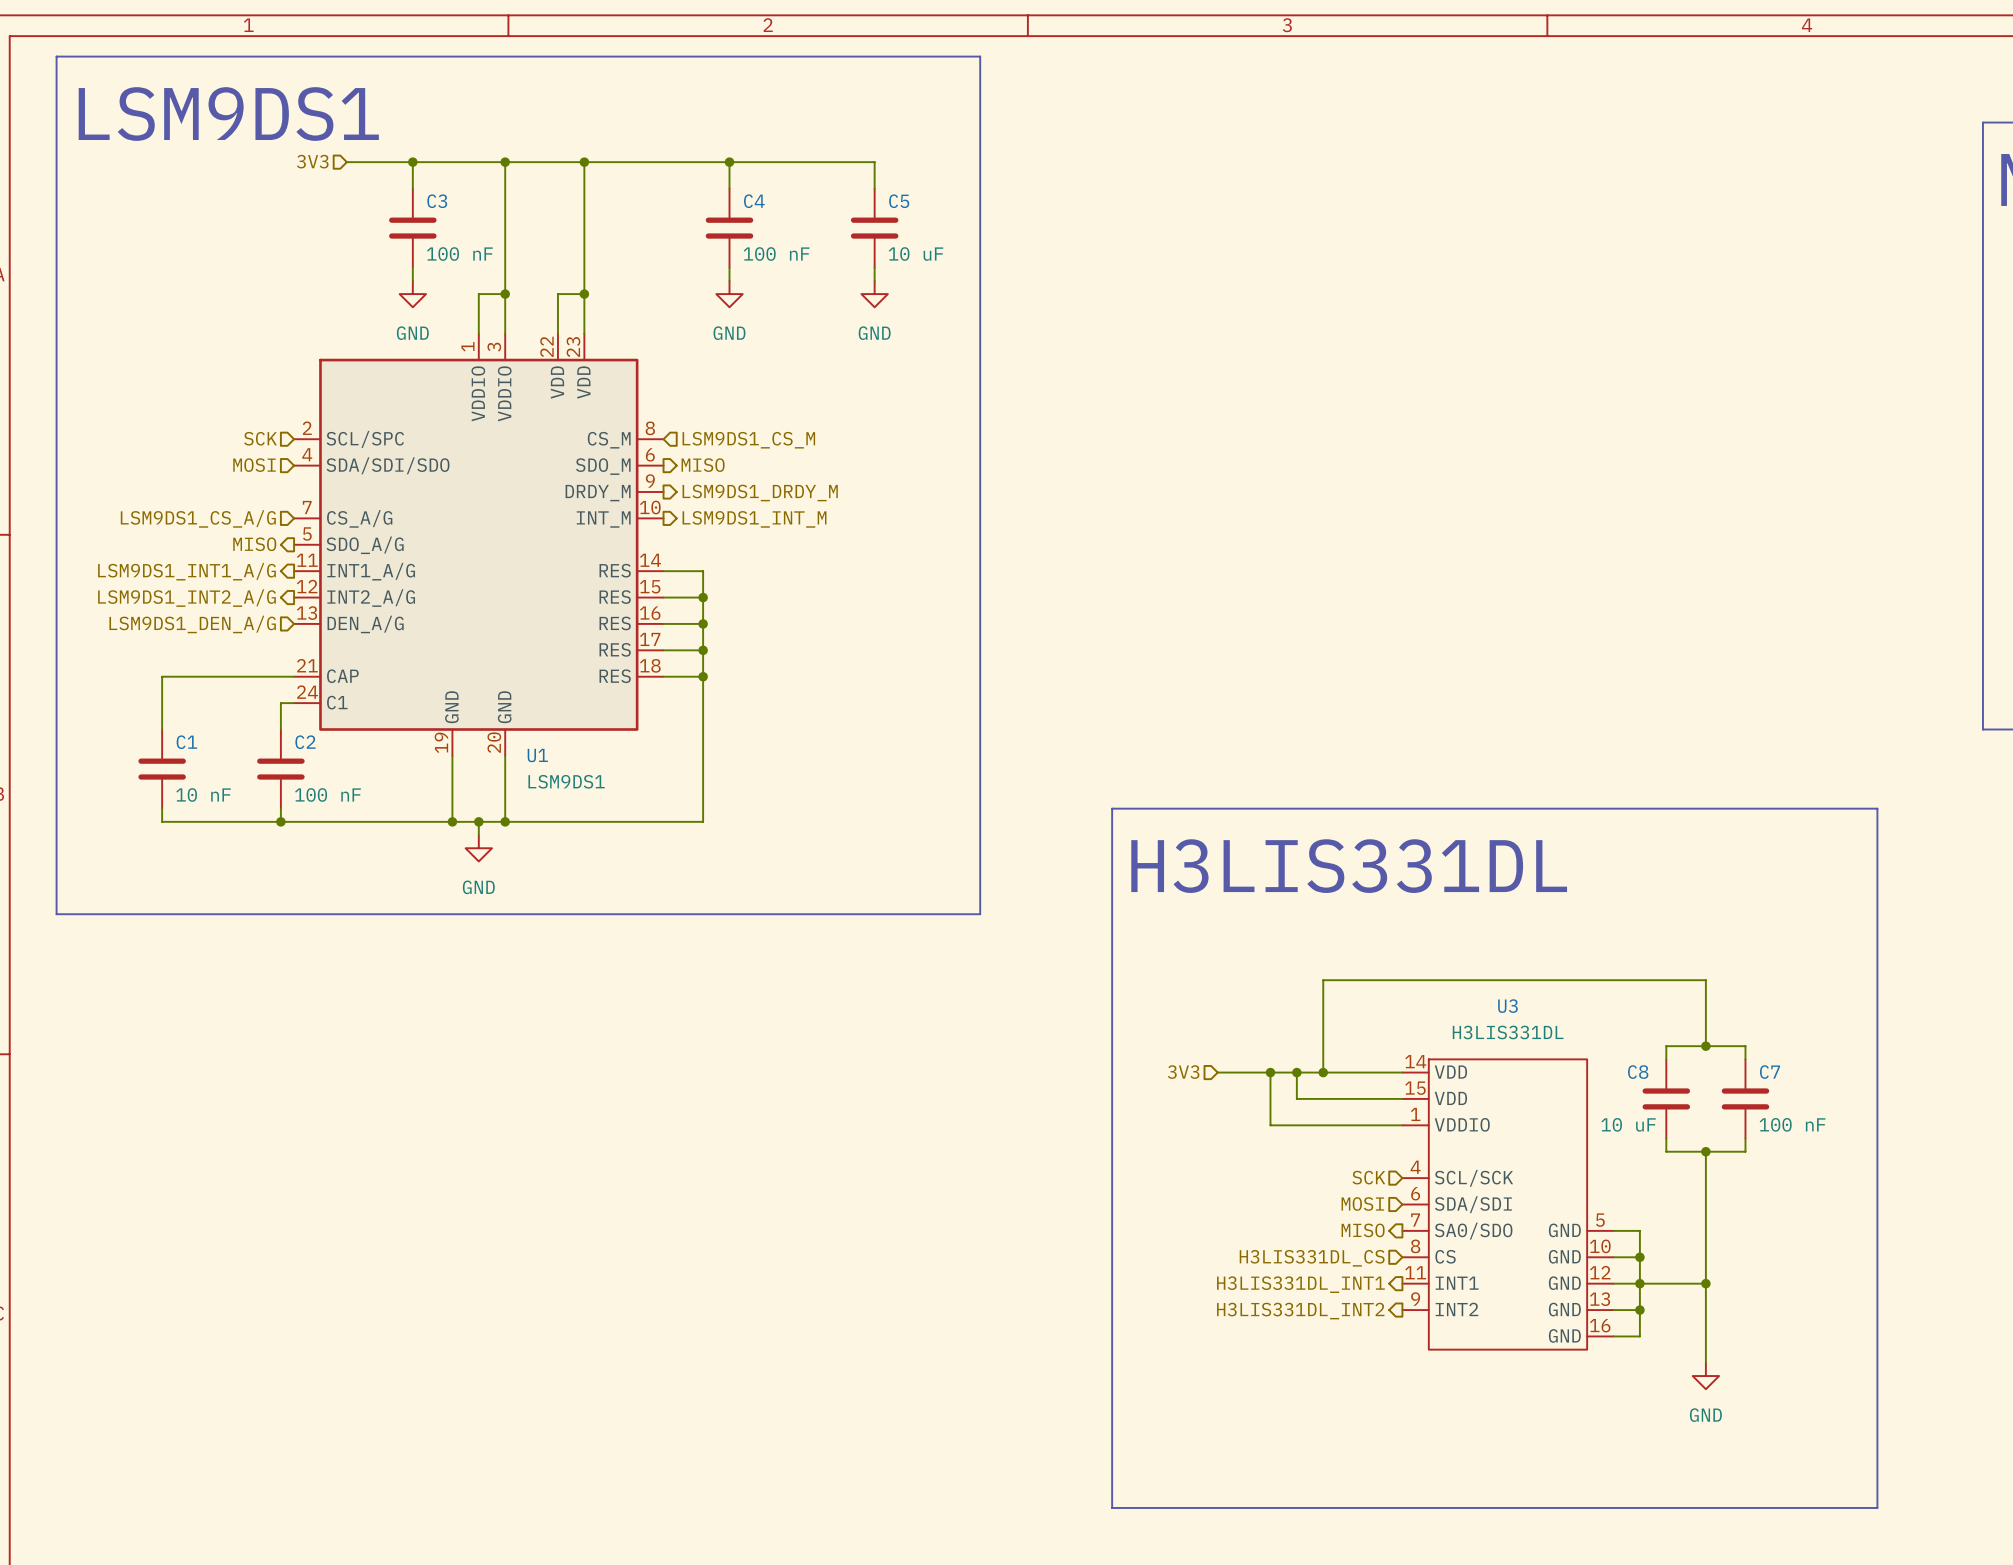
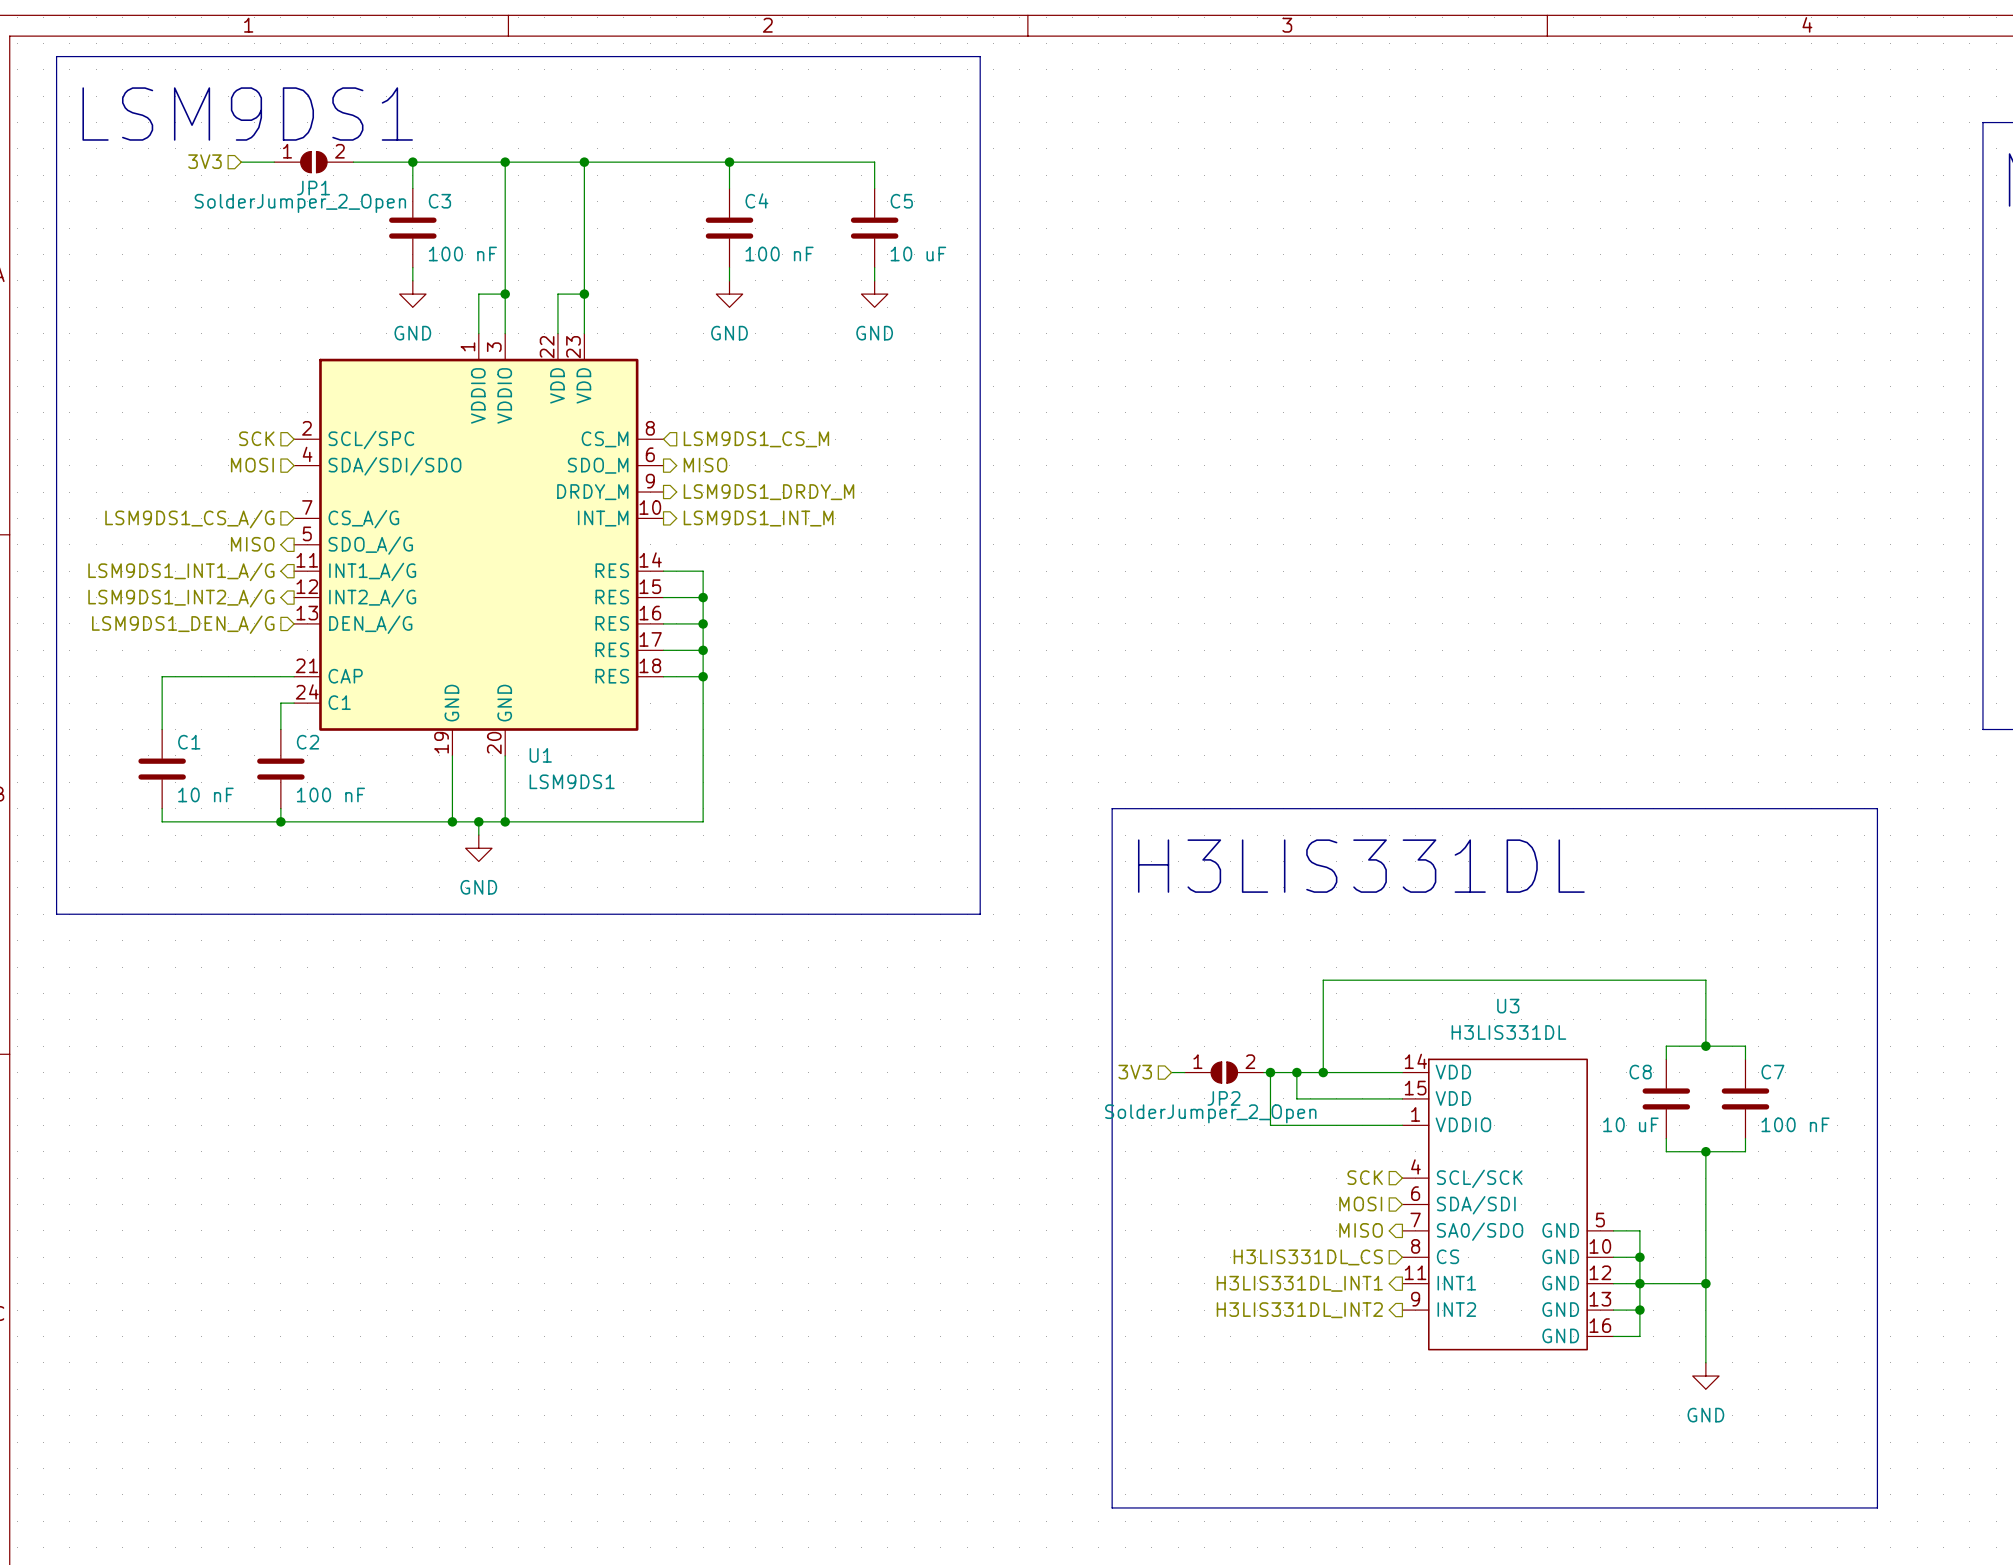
hierarchical label position: 3V3 (312, 161) -> 3V3 (204, 161)
wire: none -> (241, 162) (274, 162)
JP1: none -> SolderJumper_2_Open (313, 162)
wire: none -> (1171, 1072) (1184, 1072)
hierarchical label position: 3V3 (1183, 1072) -> 3V3 (1135, 1072)
JP2: none -> SolderJumper_2_Open (1224, 1072)

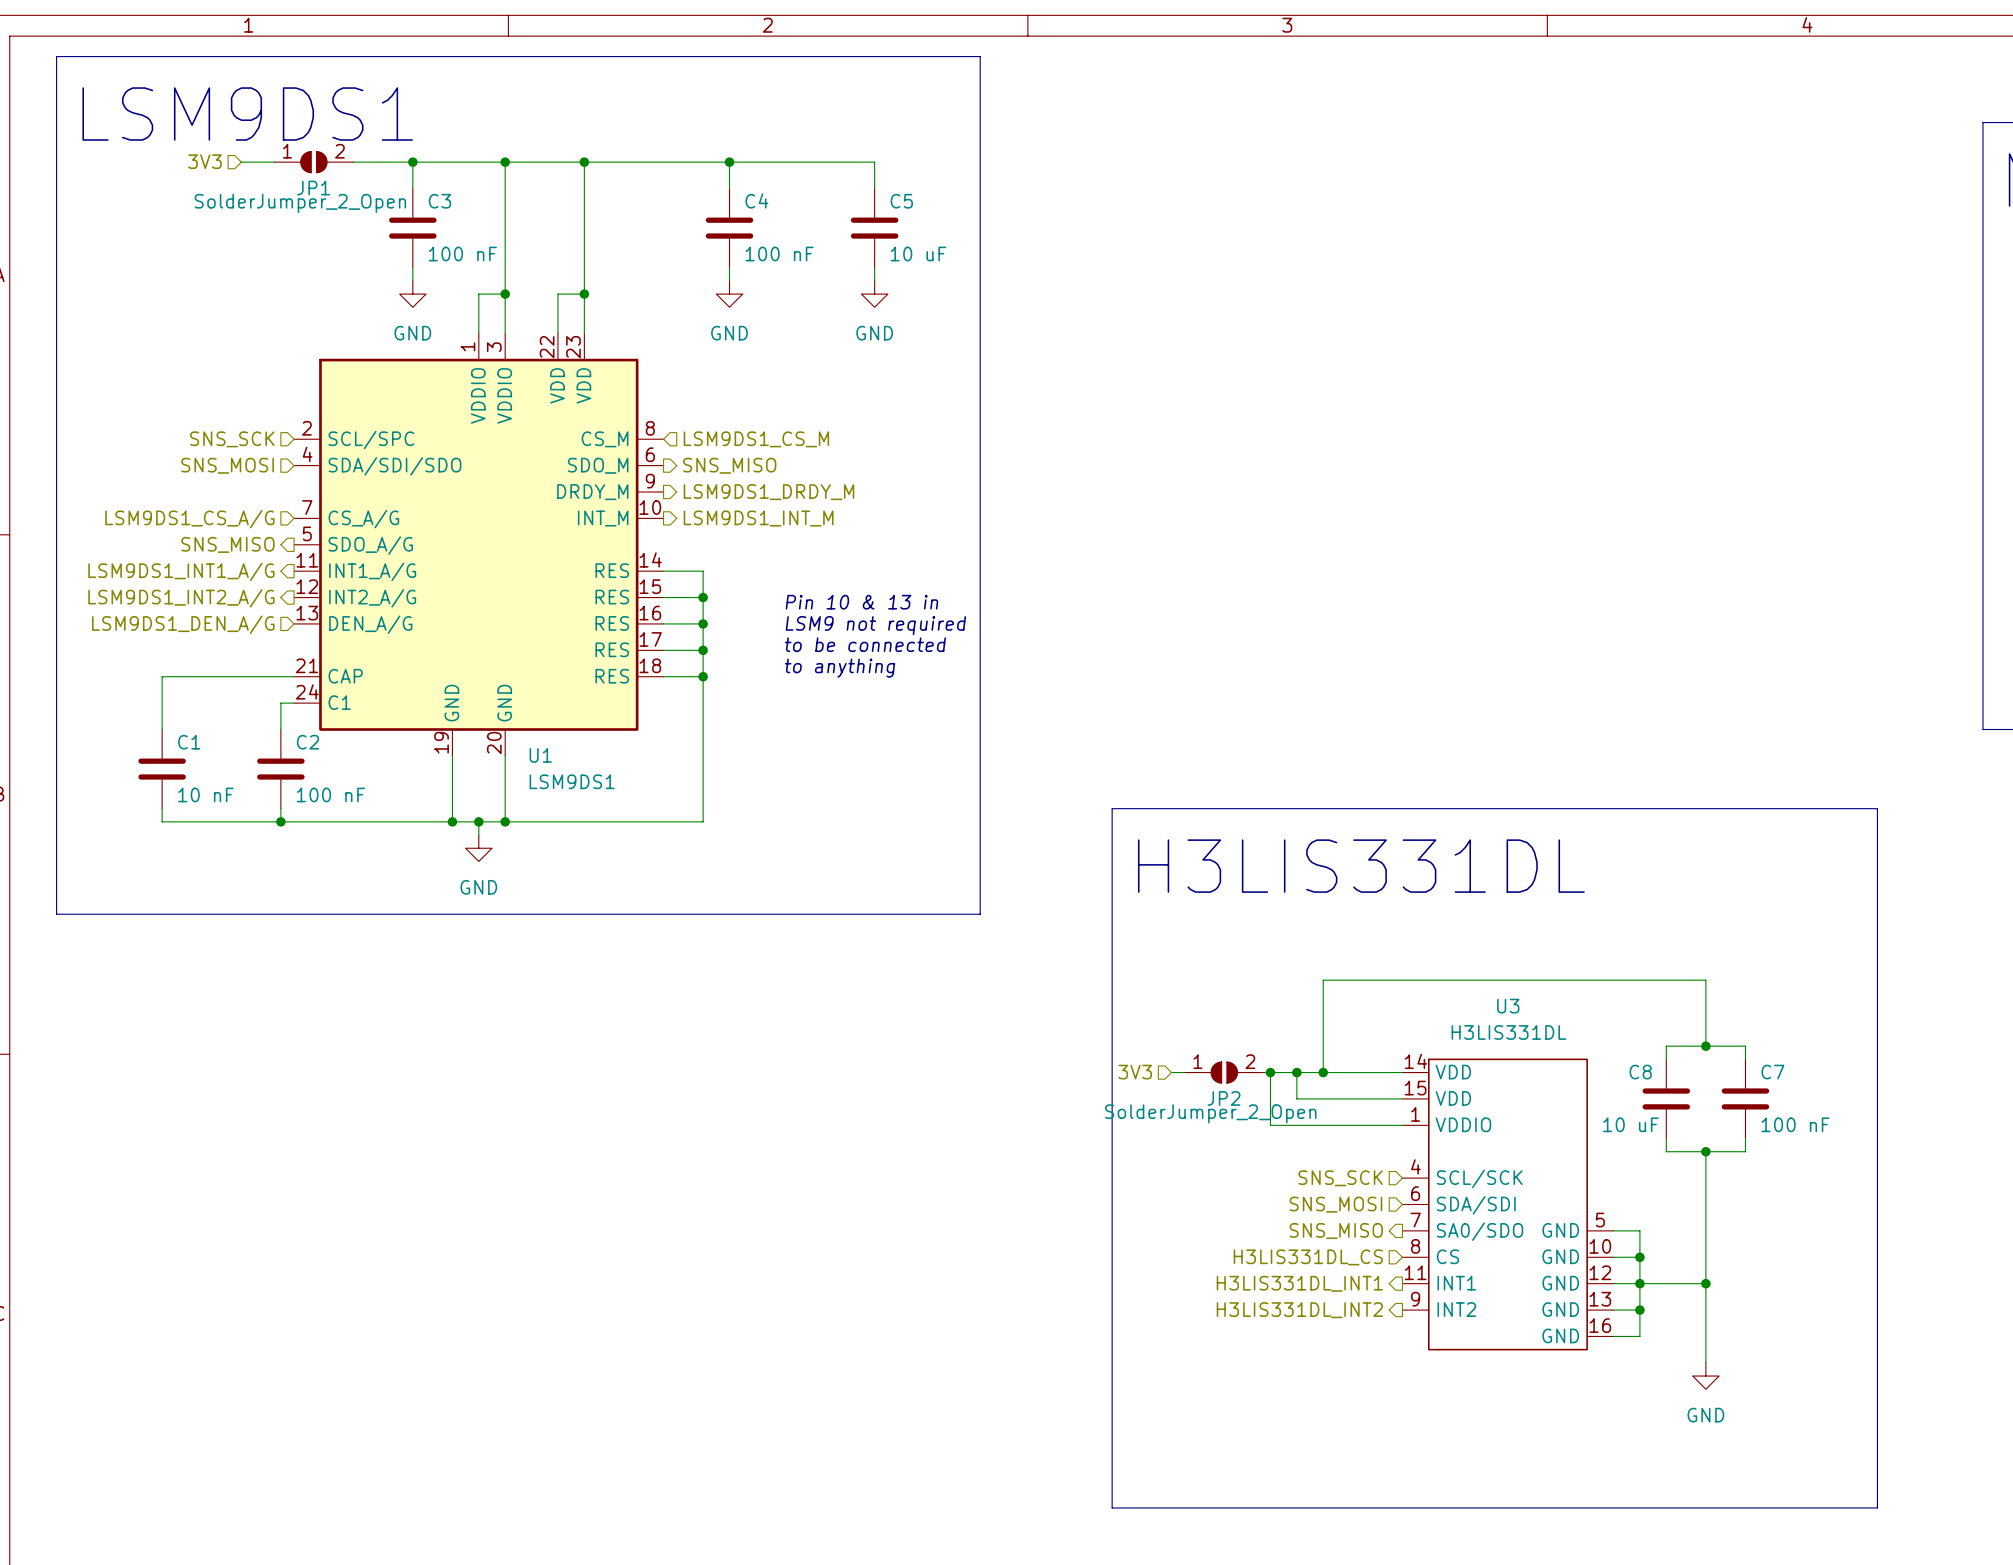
hierarchical label: SCK (256, 438) -> SNS_SCK (232, 439)
hierarchical label: MOSI (252, 465) -> SNS_MOSI (227, 465)
hierarchical label: MISO (705, 465) -> SNS_MISO (729, 465)
hierarchical label: MISO (252, 544) -> SNS_MISO (227, 544)
text: none -> Pin 10 & 13 in (861, 602)
text: none -> LSM9 not required (875, 625)
text: none -> to be connected (865, 644)
text: none -> to anything (840, 668)
hierarchical label: SCK (1365, 1177) -> SNS_SCK (1340, 1178)
hierarchical label: MOSI (1360, 1204) -> SNS_MOSI (1335, 1204)
hierarchical label: MISO (1361, 1230) -> SNS_MISO (1336, 1231)

